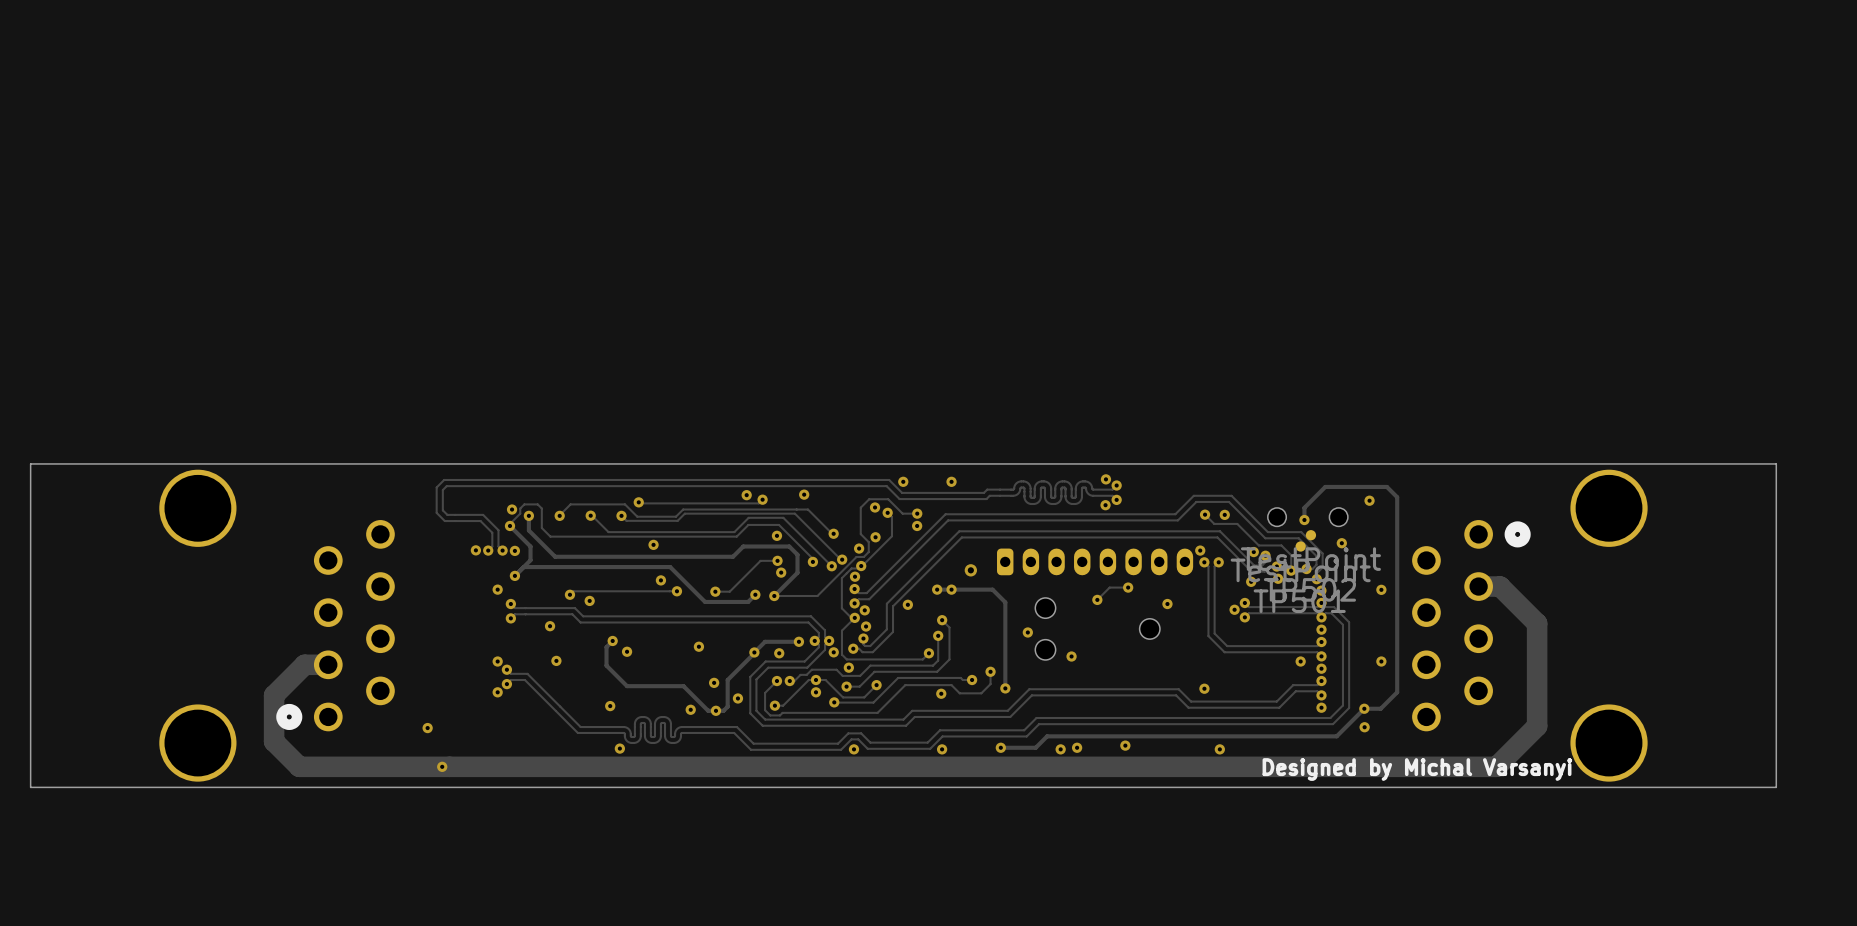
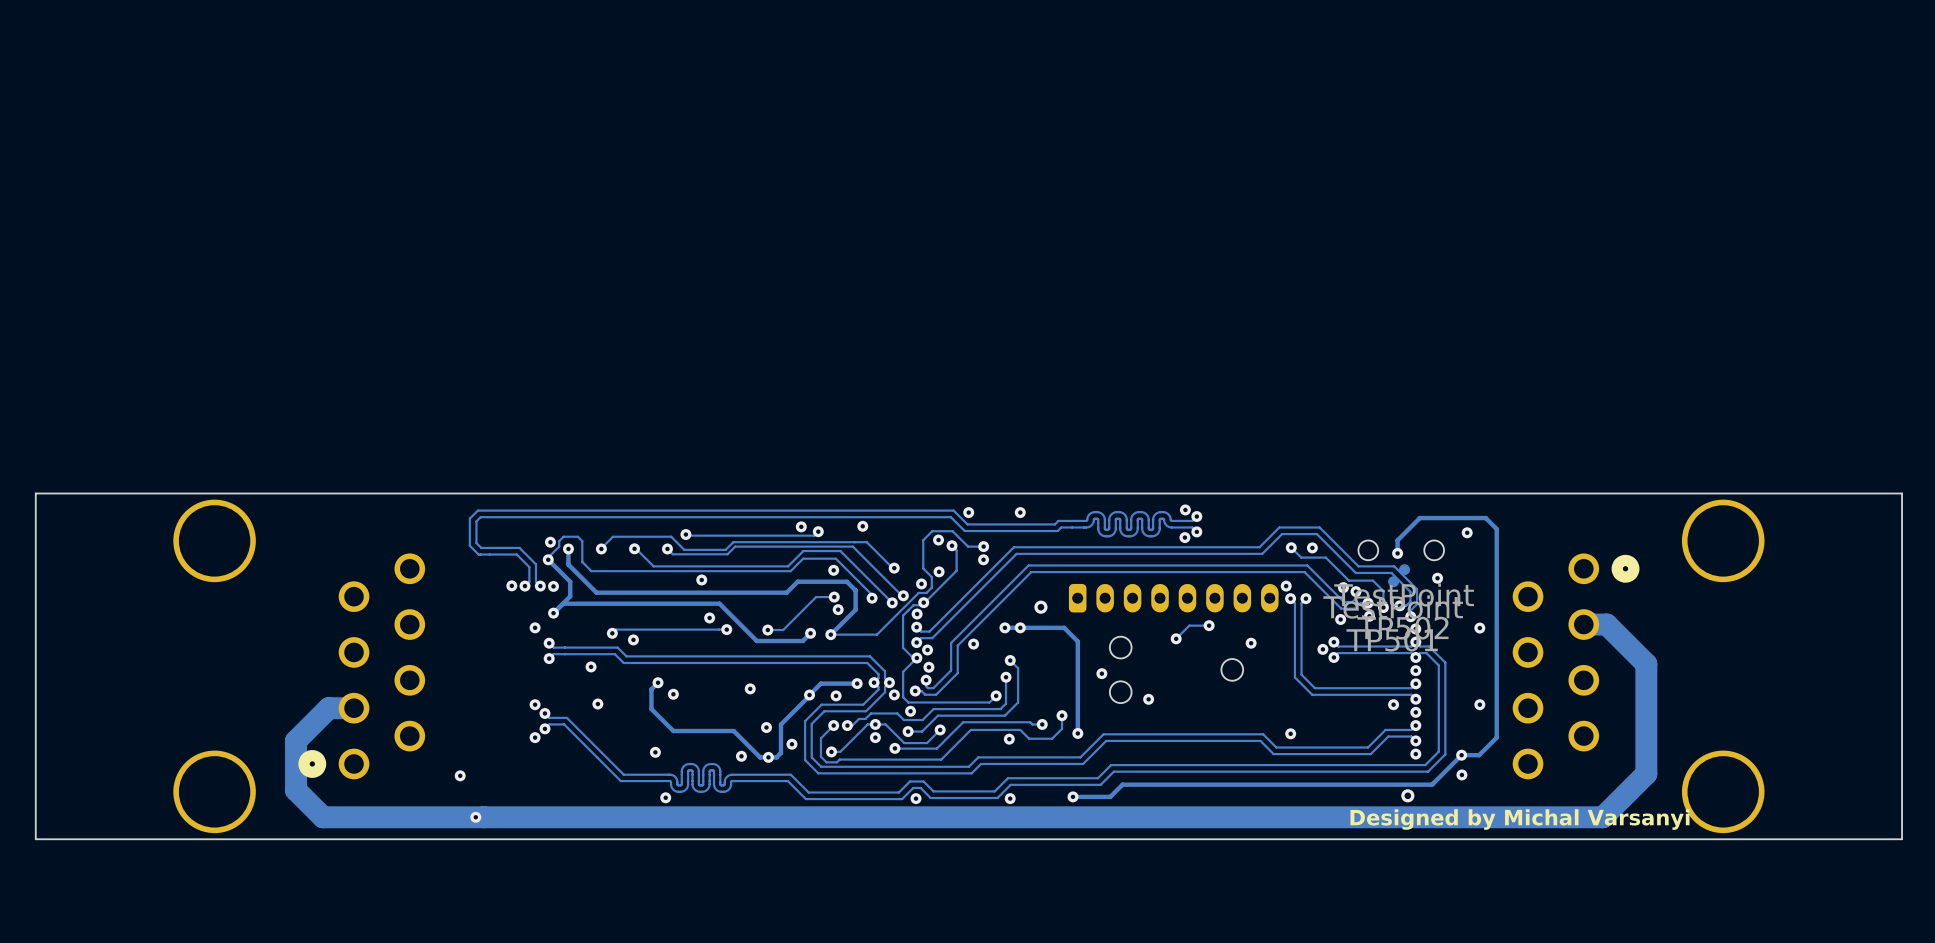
via: (1125, 745) -> none
via: none -> (1407, 795)
via: (1077, 747) -> none
via: (1060, 749) -> none
via: (1219, 749) -> none

